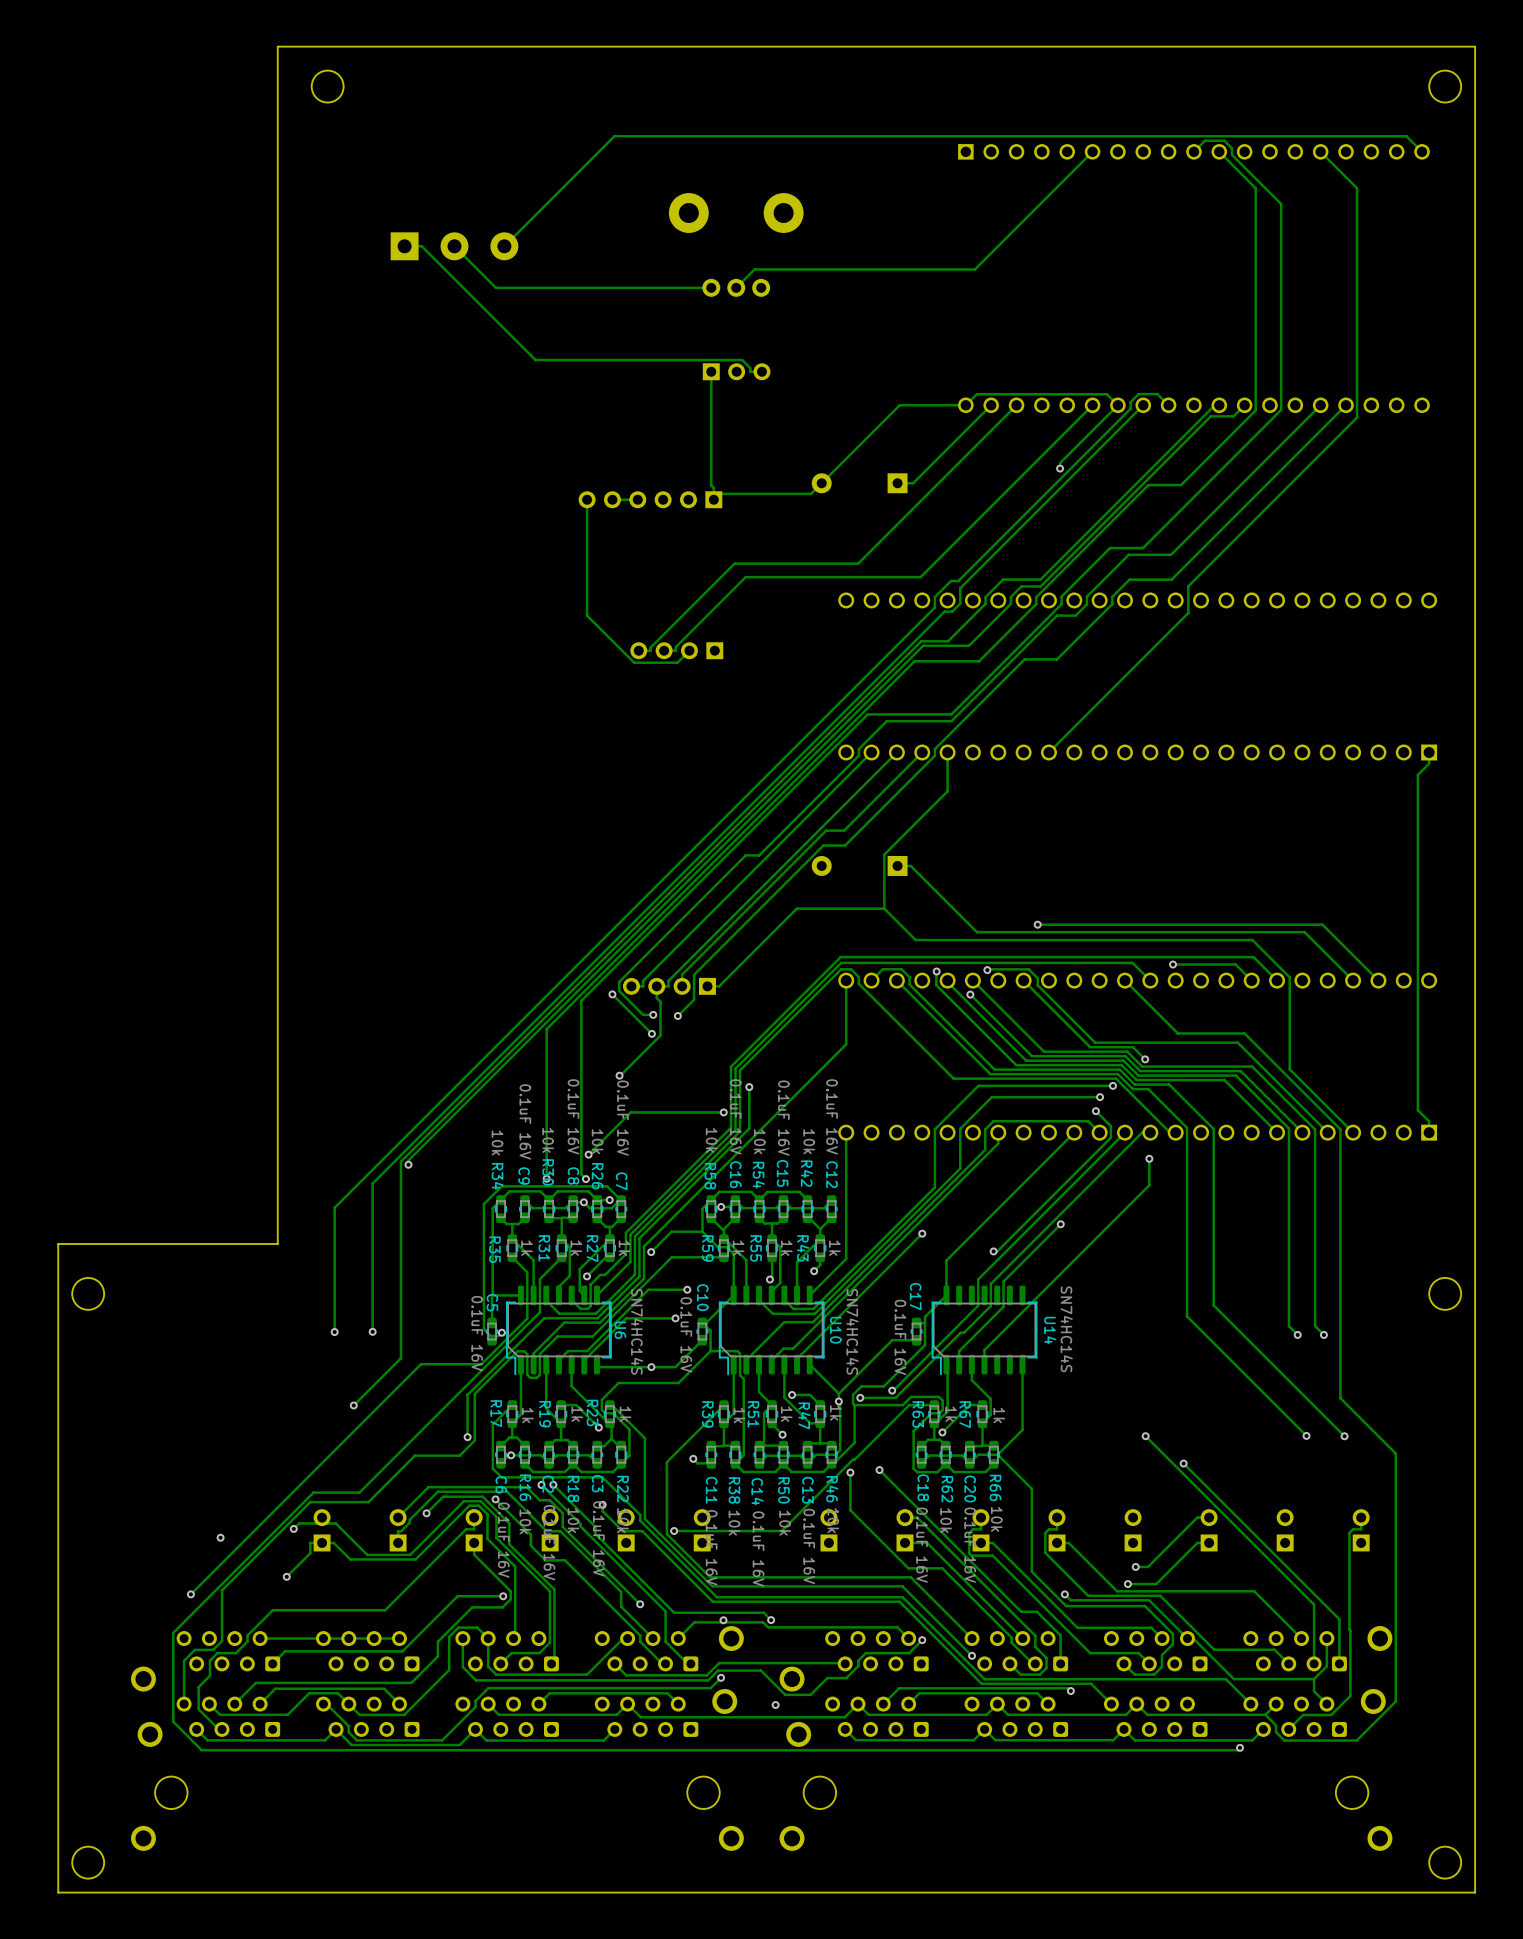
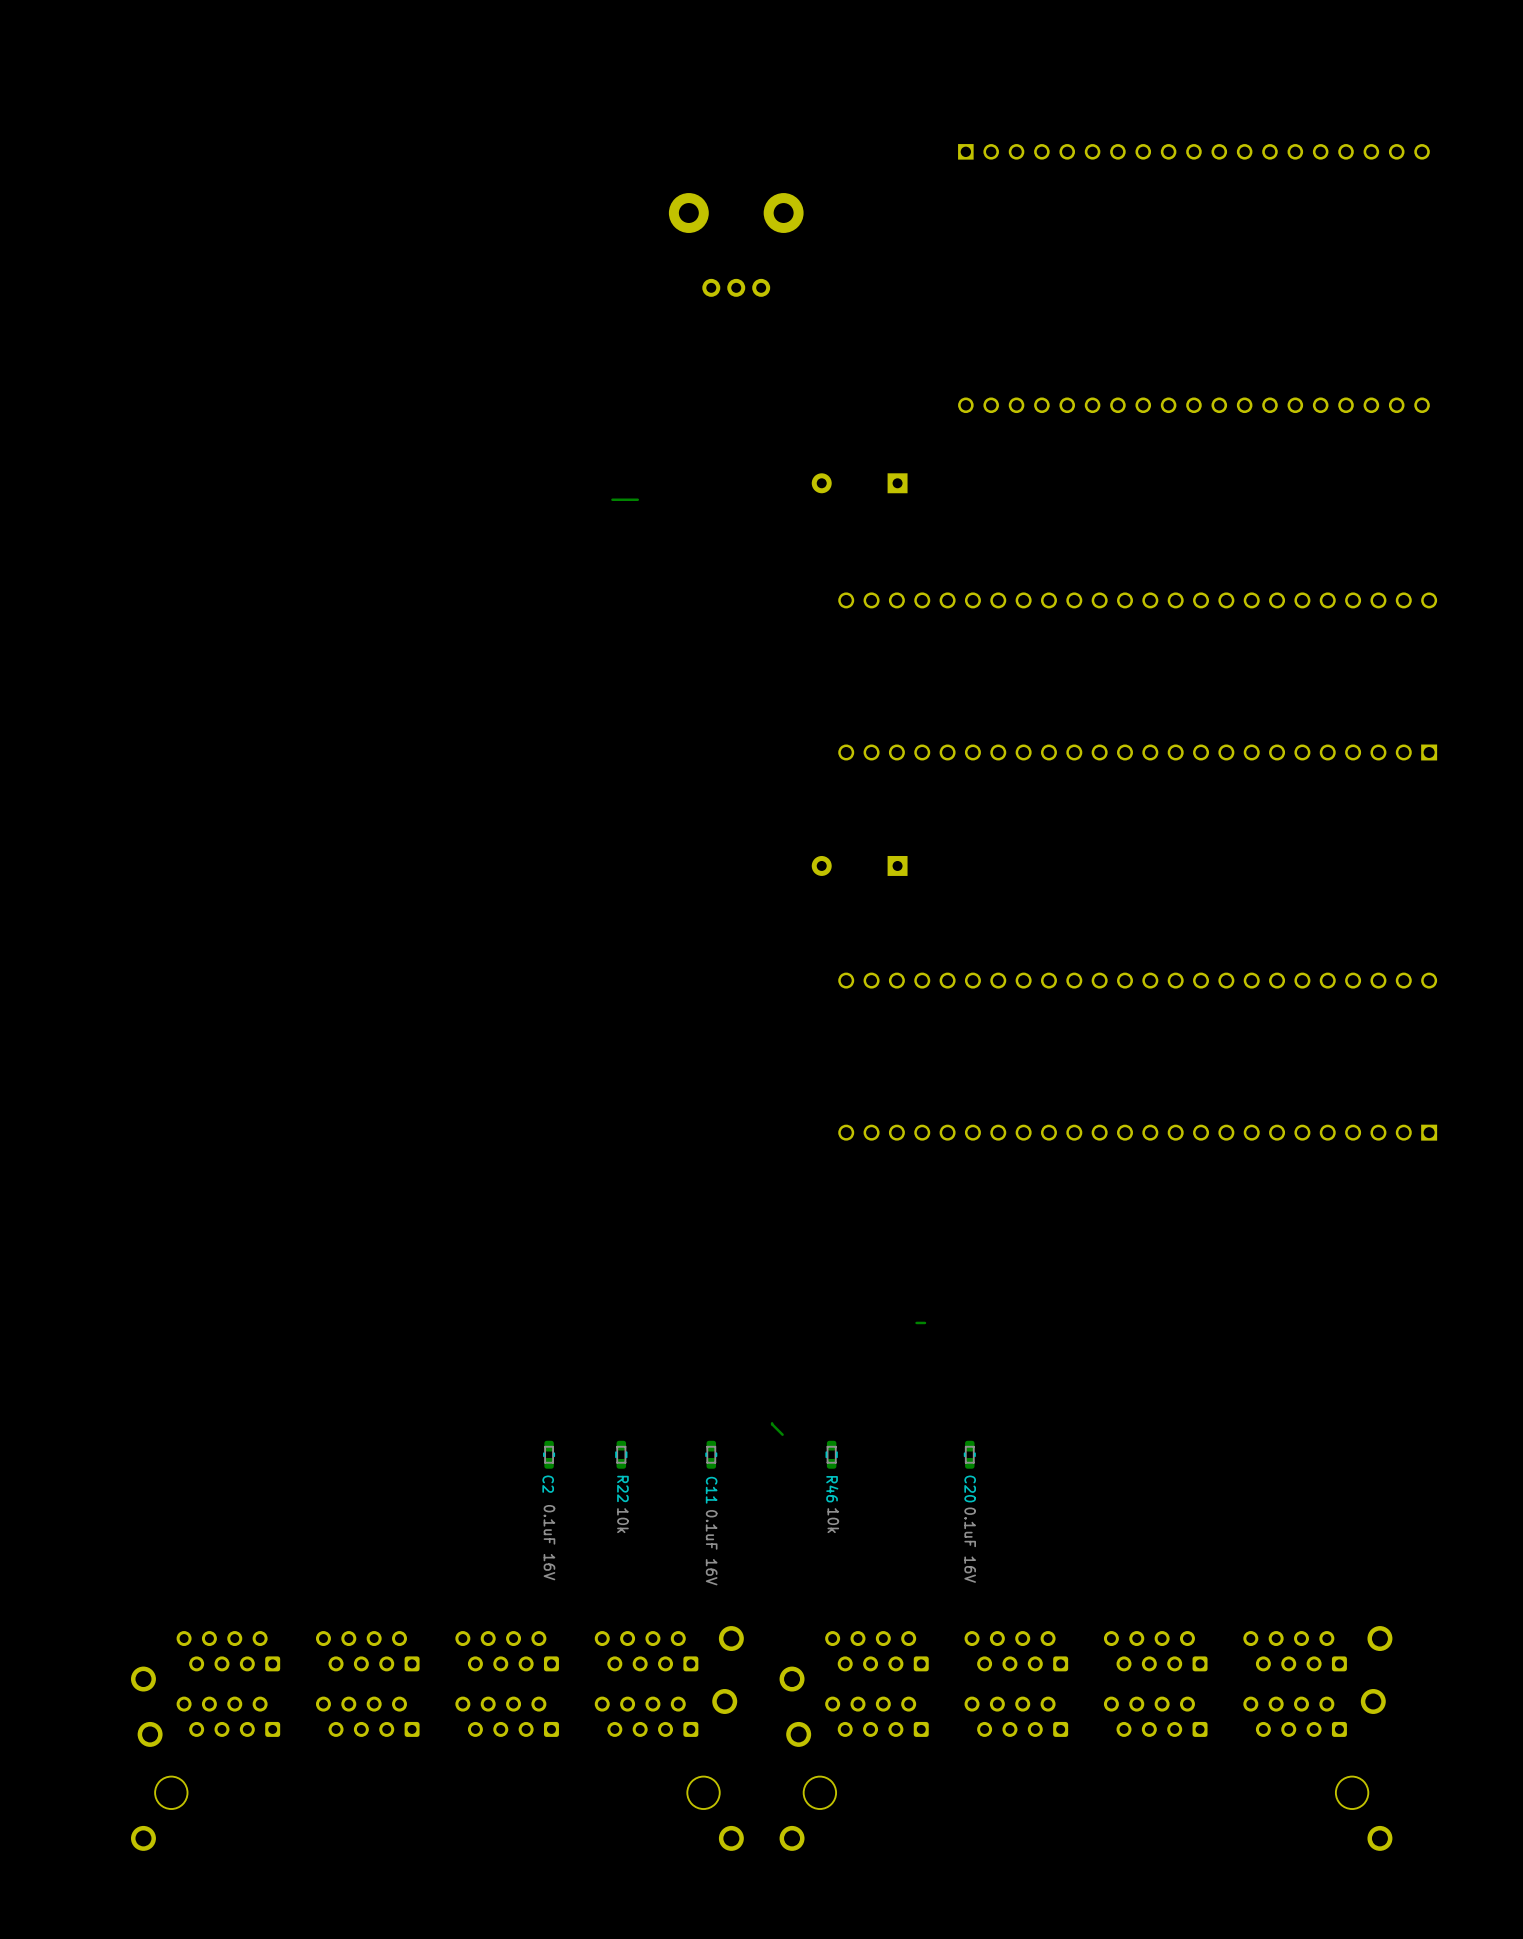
board edge: (1475, 46) (277, 46) (277, 1244) (58, 1244) (58, 1892) (1475, 1892) (1475, 46) -> none
round board edge: [311, 70, 344, 103] -> none
round board edge: [1428, 70, 1462, 103] -> none
track: (1092, 151) (974, 269) (754, 269) (736, 287) -> none
track: (1193, 151) (1205, 140) (1224, 140) (1231, 148) (1231, 154) (1281, 203) (1281, 409) (1142, 548) (1110, 548) (1061, 596) (1061, 604) (951, 714) (867, 714) (581, 1000) (581, 1174) (585, 1179) -> none
track: (1219, 151) (1255, 188) (1255, 410) (1181, 485) (1148, 485) (1036, 597) (1036, 604) (979, 661) (914, 661) (546, 1029) (546, 1178) -> none
track: (1320, 151) (1357, 188) (1357, 417) (1188, 586) (1188, 613) (1048, 752) -> none
track: (1422, 151) (1406, 136) (614, 136) (504, 246) -> none
track: (404, 246) (421, 246) (535, 360) (742, 360) (750, 368) (750, 371) (761, 371) -> none
track: (454, 246) (496, 287) (711, 287) -> none
part: (454, 246) -> none
track: (711, 371) (711, 485) (713, 488) (713, 499) -> none
part: (736, 371) -> none
track: (991, 405) (913, 483) (897, 483) -> none
track: (1016, 405) (858, 563) (734, 563) (650, 647) (650, 650) (638, 650) -> none
track: (1092, 405) (920, 577) (745, 577) (675, 647) (675, 650) (664, 650) -> none
track: (1143, 405) (960, 588) (960, 603) (952, 611) (944, 611) (372, 1183) (372, 1331) -> none
track: (1168, 405) (1157, 394) (1138, 394) (1130, 402) (1130, 408) (958, 581) (951, 581) (934, 597) (934, 607) (334, 1207) (334, 1332) -> none
track: (1219, 405) (1214, 405) (1040, 579) (1003, 579) (985, 597) (985, 603) (948, 641) (921, 641) (400, 1161) (400, 1358) (353, 1405) -> none
track: (1244, 405) (1233, 416) (1210, 416) (1040, 586) (1021, 586) (1010, 596) (1010, 603) (969, 645) (923, 645) (408, 1160) (408, 1164) -> none
track: (1320, 405) (1171, 554) (1128, 554) (1086, 596) (1086, 604) (1075, 615) (1057, 615) (951, 721) (886, 721) (858, 749) (858, 755) (759, 855) (745, 855) (619, 981) (619, 990) (643, 1014) (653, 1014) -> none
track: (1346, 405) (1171, 579) (1129, 579) (1112, 596) (1112, 604) (1057, 659) (1024, 659) (934, 749) (934, 755) (845, 845) (823, 845) (694, 974) (694, 999) (677, 1016) -> none
track: (1060, 468) (1060, 463) (1117, 405) (1106, 394) (976, 394) (965, 405) (899, 405) (811, 493) (713, 493) -> none
via: (1060, 468) -> none
track: (587, 499) (587, 615) (634, 662) (677, 662) (689, 650) -> none
part: (650, 499) -> none
part: (676, 650) -> none
track: (871, 752) (643, 980) (643, 986) (631, 986) -> none
track: (896, 752) (668, 980) (668, 986) (656, 986) (656, 998) (660, 1001) (660, 1035) (619, 1075) -> none
track: (922, 752) (844, 830) (826, 830) (682, 974) (682, 986) -> none
track: (947, 752) (947, 791) (884, 854) (884, 908) -> none
track: (1429, 752) (1429, 763) (1417, 774) (1417, 1110) (1429, 1121) (1429, 1132) -> none
track: (897, 865) (910, 865) (976, 932) (1304, 932) (1353, 980) -> none
track: (884, 908) (915, 940) (1252, 940) (1289, 977) (1289, 1069) (1353, 1132) -> none
track: (884, 908) (796, 908) (719, 986) (707, 986) -> none
track: (1037, 924) (1322, 924) (1378, 980) -> none
via: (1037, 924) -> none
track: (1173, 964) (1235, 964) (1251, 980) -> none
via: (1173, 964) -> none
track: (987, 970) (1028, 969) (1037, 978) (1037, 985) (1095, 1042) (1237, 1042) (1327, 1132) -> none
via: (987, 970) -> none
track: (936, 971) (936, 985) (1016, 1065) (1121, 1065) (1136, 1080) (1224, 1080) (1277, 1132) -> none
via: (936, 971) -> none
track: (846, 980) (846, 1044) (643, 1246) (643, 1278) (600, 1322) (564, 1322) (533, 1353) (533, 1364) -> none
track: (871, 980) (882, 969) (901, 969) (909, 977) (909, 984) (994, 1069) (1119, 1069) (1134, 1084) (1169, 1084) (1213, 1129) (1213, 1305) (1344, 1436) -> none
track: (896, 980) (990, 1074) (1117, 1074) (1132, 1089) (1148, 1089) (1187, 1127) (1187, 1316) (1306, 1435) -> none
track: (947, 980) (1026, 1060) (1123, 1060) (1138, 1075) (1236, 1075) (1288, 1128) (1288, 1326) (1297, 1334) -> none
track: (972, 980) (1044, 1051) (1127, 1051) (1142, 1066) (1252, 1066) (1315, 1129) (1315, 1326) (1323, 1334) -> none
track: (1023, 980) (1090, 1047) (1133, 1047) (1145, 1059) -> none
track: (1125, 980) (1177, 1033) (1244, 1033) (1340, 1129) (1340, 1398) (1395, 1453) (1395, 1701) (1356, 1740) (1284, 1740) (1276, 1732) (1276, 1725) (1265, 1714) -> none
track: (1150, 980) (1132, 962) (841, 962) (735, 1068) (735, 1129) (630, 1234) (630, 1261) (596, 1295) -> none
track: (1277, 980) (1253, 957) (840, 957) (731, 1066) (731, 1127) (625, 1232) (625, 1254) (605, 1274) (600, 1274) (590, 1284) (590, 1306) (588, 1308) (580, 1308) (571, 1299) (571, 1295) -> none
part: (669, 986) -> none
track: (612, 994) (651, 1033) -> none
via: (612, 994) -> none
track: (970, 994) (1031, 1056) (1125, 1056) (1140, 1071) (1240, 1071) (1302, 1132) -> none
via: (970, 994) -> none
via: (653, 1014) -> none
via: (677, 1016) -> none
via: (651, 1033) -> none
via: (1145, 1059) -> none
via: (619, 1075) -> none
track: (1112, 1085) (978, 1085) (934, 1129) (934, 1187) (813, 1308) (793, 1308) (784, 1299) (784, 1295) -> none
via: (1112, 1085) -> none
track: (749, 1087) (749, 1128) (639, 1238) (639, 1276) (597, 1318) (544, 1318) (467, 1394) (467, 1437) -> none
via: (749, 1087) -> none
track: (1100, 1097) (991, 1097) (960, 1128) (960, 1168) (814, 1313) (772, 1313) (759, 1300) (759, 1295) -> none
via: (1100, 1097) -> none
track: (1095, 1111) (1110, 1126) (1110, 1137) (997, 1251) (993, 1251) -> none
via: (1095, 1111) -> none
track: (723, 1112) (630, 1112) (588, 1154) -> none
via: (723, 1112) -> none
track: (846, 1132) (846, 1258) (809, 1295) -> none
track: (998, 1132) (998, 1143) (793, 1348) (783, 1348) (771, 1360) (771, 1364) -> none
track: (1074, 1132) (946, 1260) (946, 1295) (924, 1316) (924, 1345) (883, 1386) (861, 1386) (853, 1394) (854, 1405) -> none
track: (1099, 1132) (1088, 1121) (993, 1121) (985, 1129) (985, 1149) (812, 1322) (784, 1322) (746, 1360) (746, 1364) -> none
track: (1125, 1132) (978, 1279) (978, 1305) (892, 1390) -> none
track: (1150, 1132) (1142, 1132) (990, 1283) (990, 1305) (964, 1332) (960, 1332) (895, 1397) (860, 1397) -> none
track: (1175, 1132) (1170, 1132) (1116, 1078) (953, 1078) (858, 983) (858, 977) (851, 969) (841, 969) (739, 1070) (739, 1131) (634, 1236) (634, 1274) (595, 1313) (559, 1313) (546, 1300) (546, 1295) -> none
via: (588, 1154) -> none
track: (1149, 1158) (1149, 1185) (984, 1350) (984, 1364) -> none
via: (1149, 1158) -> none
via: (408, 1164) -> none
via: (546, 1178) -> none
via: (585, 1179) -> none
track: (620, 1199) (611, 1208) (589, 1208) (583, 1202) (573, 1200) (565, 1208) (532, 1208) (525, 1200) -> none
track: (609, 1200) (597, 1200) (588, 1191) (557, 1191) (549, 1200) (540, 1191) (509, 1191) (492, 1208) (492, 1295) -> none
via: (609, 1200) -> none
track: (621, 1200) (607, 1186) (501, 1186) (483, 1204) (483, 1329) (490, 1336) (498, 1336) (501, 1332) -> none
track: (807, 1200) (799, 1191) (767, 1191) (759, 1200) (751, 1191) (719, 1191) (702, 1208) (702, 1231) -> none
track: (831, 1200) (823, 1208) (791, 1208) (783, 1200) (775, 1208) (742, 1208) (735, 1200) (728, 1206) (721, 1206) -> none
via: (583, 1202) -> none
via: (721, 1206) -> none
R34: 10k (500, 1209) -> none
C9: 0.1uF 16V (525, 1209) -> none
R30: 10k (549, 1209) -> none
C8: 0.1uF 16V (573, 1209) -> none
R26: 10k (597, 1209) -> none
C7: 0.1uF 16V (621, 1209) -> none
R58: 10k (711, 1209) -> none
C16: 0.1uF 16V (735, 1209) -> none
R54: 10k (759, 1209) -> none
C15: 0.1uF 16V (783, 1209) -> none
R42: 10k (807, 1209) -> none
C12: 0.1uF 16V (831, 1209) -> none
track: (525, 1217) (518, 1224) (506, 1224) (500, 1218) -> none
track: (573, 1217) (561, 1218) -> none
track: (621, 1217) (612, 1226) (605, 1226) (597, 1218) -> none
track: (735, 1217) (723, 1229) -> none
track: (783, 1217) (777, 1223) (764, 1223) (759, 1218) -> none
track: (831, 1217) (820, 1229) -> none
track: (561, 1218) (561, 1239) (569, 1247) (569, 1275) (558, 1286) (558, 1295) -> none
track: (561, 1218) (549, 1218) -> none
track: (711, 1218) (723, 1229) -> none
track: (807, 1218) (820, 1229) -> none
track: (772, 1223) (772, 1239) (780, 1247) (780, 1282) (771, 1291) (771, 1295) -> none
track: (512, 1224) (512, 1239) (533, 1260) (533, 1295) -> none
track: (1060, 1224) (1003, 1281) (1003, 1306) (959, 1351) (959, 1364) -> none
via: (1060, 1224) -> none
track: (609, 1226) (609, 1239) (579, 1269) (579, 1290) (584, 1295) -> none
track: (723, 1229) (723, 1239) (746, 1260) (746, 1295) -> none
track: (820, 1229) (820, 1239) (797, 1262) (797, 1295) -> none
track: (702, 1231) (717, 1247) (726, 1247) (733, 1253) (733, 1295) (704, 1324) -> none
track: (702, 1231) (671, 1231) (651, 1252) -> none
track: (922, 1233) (797, 1358) (797, 1364) -> none
via: (922, 1233) -> none
R35: 1k (512, 1248) -> none
R31: 1k (561, 1248) -> none
R27: 1k (609, 1248) -> none
R59: 1k (723, 1248) -> none
R55: 1k (772, 1248) -> none
R43: 1k (820, 1248) -> none
via: (993, 1251) -> none
via: (651, 1252) -> none
track: (512, 1257) (527, 1272) (527, 1318) (481, 1364) (421, 1364) (190, 1594) -> none
track: (561, 1257) (539, 1279) (539, 1312) (359, 1492) (313, 1492) (173, 1632) (173, 1721) (201, 1750) (1237, 1750) (1240, 1747) -> none
track: (609, 1257) (606, 1257) (586, 1276) -> none
track: (723, 1257) (671, 1257) (592, 1336) (557, 1336) (539, 1354) (539, 1374) (536, 1377) (530, 1377) (527, 1374) (527, 1354) (524, 1351) (517, 1351) (474, 1393) (474, 1440) (459, 1455) (414, 1455) (368, 1502) (310, 1502) (222, 1590) (222, 1641) (213, 1649) (195, 1649) (184, 1660) (184, 1704) -> none
track: (772, 1257) (772, 1277) (769, 1279) -> none
track: (820, 1257) (820, 1265) (814, 1271) -> none
via: (814, 1271) -> none
via: (586, 1276) -> none
round board edge: [71, 1277, 105, 1311] -> none
round board edge: [1428, 1277, 1462, 1311] -> none
via: (769, 1279) -> none
track: (687, 1289) (648, 1289) (587, 1351) (568, 1351) (558, 1360) (558, 1364) -> none
via: (687, 1289) -> none
track: (492, 1295) (492, 1322) -> none
track: (520, 1295) (492, 1295) -> none
track: (675, 1318) (626, 1318) (584, 1360) (584, 1364) -> none
via: (675, 1318) -> none
track: (702, 1322) (710, 1331) (710, 1351) -> none
U6: SN74HC14S (558, 1330) -> none
U10: SN74HC14S (771, 1330) -> none
U14: SN74HC14S (984, 1330) -> none
via: (372, 1331) -> none
C5: 0.1uF 16V (492, 1331) -> none
C10: 0.1uF 16V (702, 1331) -> none
C17: 0.1uF 16V (916, 1331) -> none
via: (334, 1332) -> none
via: (501, 1332) -> none
via: (1297, 1334) -> none
via: (1323, 1334) -> none
track: (702, 1340) (675, 1367) (599, 1367) (596, 1364) -> none
track: (916, 1340) (892, 1340) (838, 1393) -> none
track: (710, 1351) (678, 1382) (618, 1382) (601, 1399) (601, 1409) (605, 1413) (613, 1413) (629, 1429) (629, 1455) (613, 1471) (581, 1471) (573, 1463) (565, 1471) (533, 1471) (525, 1463) -> none
track: (710, 1351) (737, 1351) (740, 1353) (740, 1375) (743, 1378) (743, 1455) (735, 1463) (743, 1471) (775, 1471) (783, 1463) (791, 1471) (823, 1471) (854, 1442) (854, 1405) -> none
track: (520, 1364) (520, 1414) (512, 1423) (512, 1437) -> none
track: (546, 1364) (546, 1408) (561, 1423) (561, 1440) -> none
track: (571, 1364) (571, 1386) (611, 1424) (611, 1438) -> none
track: (733, 1364) (733, 1413) (723, 1423) (723, 1445) -> none
track: (759, 1364) (759, 1392) (772, 1405) (764, 1413) (764, 1445) -> none
track: (784, 1364) (784, 1397) (810, 1423) (820, 1423) (820, 1443) -> none
track: (809, 1364) (838, 1393) -> none
track: (946, 1364) (947, 1411) (934, 1423) (934, 1439) -> none
track: (971, 1364) (971, 1380) (990, 1398) (990, 1415) (982, 1423) (982, 1445) -> none
track: (1022, 1364) (1022, 1430) (997, 1454) -> none
via: (651, 1367) -> none
via: (892, 1390) -> none
track: (838, 1393) (840, 1450) (835, 1454) (816, 1454) (807, 1463) (799, 1455) (767, 1455) (759, 1463) -> none
track: (792, 1394) (810, 1394) (820, 1405) -> none
via: (792, 1394) -> none
via: (860, 1397) -> none
via: (838, 1401) -> none
via: (353, 1405) -> none
track: (512, 1405) (492, 1424) (492, 1468) (501, 1477) (602, 1477) (640, 1515) (640, 1520) (716, 1597) (902, 1597) (984, 1679) (1226, 1679) (1250, 1704) -> none
track: (561, 1405) (576, 1405) (598, 1427) -> none
track: (609, 1405) (644, 1438) (644, 1518) (712, 1586) (902, 1586) (972, 1655) -> none
track: (723, 1405) (666, 1462) (666, 1534) (710, 1577) (910, 1577) (972, 1638) -> none
track: (854, 1405) (902, 1405) (911, 1396) (938, 1396) (942, 1400) (942, 1410) (939, 1413) (931, 1413) (913, 1431) (913, 1468) (917, 1472) (937, 1472) (945, 1463) (953, 1472) (985, 1472) (993, 1463) -> none
track: (934, 1405) (909, 1405) (781, 1530) (674, 1530) -> none
track: (982, 1405) (969, 1405) (942, 1432) -> none
R17: 1k (512, 1414) -> none
R19: 1k (561, 1414) -> none
R23: 1k (609, 1414) -> none
R39: 1k (723, 1414) -> none
R51: 1k (772, 1414) -> none
R47: 1k (820, 1414) -> none
R63: 1k (934, 1414) -> none
R67: 1k (982, 1414) -> none
via: (598, 1427) -> none
via: (942, 1432) -> none
via: (782, 1434) -> none
via: (1306, 1435) -> none
track: (1145, 1436) (1314, 1604) (1314, 1663) -> none
via: (1145, 1436) -> none
via: (1344, 1436) -> none
via: (467, 1437) -> none
track: (611, 1438) (604, 1446) (597, 1446) -> none
track: (611, 1438) (618, 1445) (621, 1445) -> none
track: (525, 1445) (516, 1437) (509, 1437) (500, 1446) -> none
track: (573, 1445) (567, 1440) (555, 1440) (549, 1446) -> none
track: (723, 1445) (711, 1446) -> none
track: (735, 1445) (723, 1445) -> none
track: (783, 1445) (764, 1445) -> none
track: (831, 1445) (829, 1443) (810, 1443) (807, 1446) -> none
track: (945, 1445) (939, 1439) (927, 1439) (921, 1446) -> none
track: (982, 1445) (969, 1446) -> none
track: (993, 1445) (982, 1445) -> none
C6: 0.1uF 16V (500, 1454) -> none
R16: 10k (525, 1454) -> none
R18: 10k (573, 1454) -> none
C3: 0.1uF 16V (597, 1454) -> none
R38: 10k (735, 1454) -> none
C14: 0.1uF 16V (759, 1454) -> none
R50: 10k (783, 1454) -> none
C13: 0.1uF 16V (807, 1454) -> none
C18: 0.1uF 16V (921, 1454) -> none
R62: 10k (945, 1454) -> none
R66: 10k (993, 1454) -> none
track: (997, 1454) (1031, 1488) (1031, 1571) (1066, 1606) (1145, 1606) (1172, 1633) (1172, 1644) (1162, 1655) (1162, 1666) (1154, 1674) (1134, 1674) (1124, 1663) -> none
track: (997, 1454) (978, 1454) (969, 1463) (962, 1455) (929, 1455) (921, 1463) -> none
via: (511, 1455) -> none
track: (693, 1458) (697, 1463) (711, 1463) -> none
via: (693, 1458) -> none
track: (597, 1463) (589, 1455) (557, 1455) (549, 1463) (541, 1455) (508, 1455) (500, 1463) -> none
track: (1183, 1463) (1339, 1619) (1339, 1663) -> none
via: (1183, 1463) -> none
track: (879, 1470) (1021, 1611) (1036, 1611) (1060, 1635) (1060, 1663) -> none
via: (879, 1470) -> none
track: (850, 1472) (850, 1510) (908, 1568) (942, 1568) (1011, 1637) (1011, 1642) (1032, 1663) (1035, 1663) -> none
via: (850, 1472) -> none
track: (541, 1484) (665, 1611) (665, 1641) (687, 1663) (690, 1663) -> none
via: (541, 1484) -> none
track: (553, 1484) (595, 1526) (595, 1534) (674, 1612) (763, 1612) (771, 1620) -> none
via: (553, 1484) -> none
track: (495, 1499) (530, 1534) (530, 1545) (545, 1560) (564, 1560) (640, 1635) (640, 1641) (662, 1663) (665, 1663) -> none
via: (495, 1499) -> none
track: (602, 1504) (602, 1511) (622, 1531) (642, 1531) (712, 1601) (899, 1601) (981, 1683) (1091, 1683) (1111, 1704) -> none
via: (602, 1504) -> none
track: (426, 1513) (443, 1496) (482, 1496) (509, 1523) (509, 1544) (554, 1589) (554, 1660) (551, 1663) -> none
via: (426, 1513) -> none
track: (398, 1517) (428, 1487) (526, 1487) (539, 1500) (549, 1500) (562, 1513) (562, 1526) (640, 1604) -> none
track: (474, 1517) (474, 1529) (466, 1529) (385, 1610) (272, 1610) (247, 1635) (247, 1641) (235, 1653) (217, 1653) (209, 1660) (209, 1675) (198, 1687) (198, 1709) (218, 1729) (221, 1729) -> none
track: (904, 1517) (917, 1517) (1035, 1635) (1035, 1646) (1046, 1658) (1046, 1668) (1039, 1674) (1020, 1674) (1009, 1663) -> none
track: (981, 1517) (981, 1529) (972, 1529) (969, 1532) (969, 1553) (971, 1555) (992, 1555) (1090, 1653) (1138, 1653) (1149, 1663) -> none
track: (1057, 1517) (1057, 1529) (1048, 1529) (1045, 1532) (1045, 1552) (1088, 1595) (1160, 1595) (1214, 1649) (1274, 1649) (1288, 1663) -> none
track: (1209, 1517) (1197, 1517) (1148, 1566) (1135, 1566) -> none
track: (1361, 1517) (1361, 1529) (1353, 1529) (1349, 1532) (1350, 1695) (1331, 1714) (1303, 1714) (1288, 1729) -> none
track: (293, 1528) (299, 1523) (335, 1523) (367, 1554) (410, 1554) (463, 1501) (480, 1501) (496, 1516) (496, 1537) (549, 1591) (549, 1642) (539, 1653) (511, 1653) (500, 1663) -> none
via: (293, 1528) -> none
part: (322, 1530) -> none
part: (398, 1530) -> none
part: (474, 1530) -> none
part: (550, 1530) -> none
part: (626, 1530) -> none
via: (674, 1530) -> none
part: (702, 1530) -> none
part: (828, 1530) -> none
part: (904, 1530) -> none
part: (981, 1530) -> none
part: (1057, 1530) -> none
part: (1133, 1530) -> none
part: (1209, 1530) -> none
part: (1285, 1530) -> none
part: (1361, 1530) -> none
via: (220, 1537) -> none
track: (398, 1542) (398, 1531) (401, 1531) (437, 1491) (507, 1491) (546, 1531) (560, 1531) (621, 1591) (621, 1606) (652, 1638) -> none
track: (474, 1542) (474, 1554) (510, 1591) (510, 1599) (502, 1607) (472, 1607) (437, 1641) (437, 1656) (411, 1682) (255, 1682) (234, 1704) -> none
track: (904, 1542) (927, 1542) (1022, 1638) -> none
track: (981, 1542) (992, 1542) (1077, 1627) (1151, 1627) (1162, 1638) -> none
track: (1057, 1542) (1068, 1542) (1117, 1591) (1254, 1591) (1301, 1638) -> none
track: (1209, 1542) (1197, 1542) (1156, 1584) (1127, 1584) -> none
via: (1135, 1566) -> none
track: (286, 1576) (310, 1553) (310, 1542) (333, 1542) (350, 1559) (415, 1559) (469, 1505) (478, 1505) (487, 1514) (487, 1538) (515, 1566) (515, 1636) (513, 1638) -> none
via: (286, 1576) -> none
via: (1127, 1584) -> none
via: (190, 1594) -> none
track: (1064, 1594) (1070, 1600) (1149, 1600) (1187, 1638) (1193, 1638) (1233, 1679) (1314, 1679) -> none
via: (1064, 1594) -> none
track: (503, 1596) (457, 1596) (402, 1651) (285, 1651) (272, 1663) -> none
via: (503, 1596) -> none
via: (640, 1604) -> none
via: (723, 1620) -> none
via: (771, 1620) -> none
track: (399, 1638) (260, 1638) -> none
track: (462, 1638) (462, 1667) (476, 1680) (708, 1680) (718, 1670) (761, 1670) (785, 1694) (810, 1694) (827, 1678) (846, 1678) (858, 1665) (858, 1660) (865, 1653) (909, 1653) (922, 1640) -> none
track: (627, 1638) (623, 1638) (587, 1674) (496, 1674) (488, 1666) (488, 1638) (477, 1627) (458, 1627) (449, 1636) (449, 1670) (404, 1714) (359, 1714) (337, 1693) (309, 1693) (287, 1714) (220, 1714) (209, 1704) -> none
track: (908, 1638) (897, 1627) (768, 1627) (763, 1622) (694, 1622) (678, 1638) -> none
track: (1326, 1638) (1326, 1666) (1314, 1679) -> none
via: (922, 1640) -> none
via: (972, 1655) -> none
track: (845, 1663) (719, 1663) (706, 1675) (626, 1675) (614, 1663) -> none
track: (721, 1677) (710, 1688) (488, 1688) (475, 1701) (475, 1707) (442, 1740) (356, 1740) (348, 1732) (348, 1726) (326, 1704) (323, 1704) -> none
via: (721, 1677) -> none
track: (1314, 1679) (1314, 1691) (1326, 1704) -> none
track: (1070, 1691) (1068, 1688) (899, 1688) (883, 1704) -> none
via: (1070, 1691) -> none
track: (399, 1704) (384, 1688) (275, 1688) (260, 1704) -> none
track: (488, 1704) (498, 1714) (616, 1714) (627, 1704) (640, 1717) (844, 1717) (857, 1704) (868, 1714) (986, 1714) (997, 1704) (1008, 1714) (1126, 1714) (1136, 1704) (1147, 1714) (1265, 1714) -> none
track: (678, 1704) (667, 1693) (549, 1693) (538, 1704) -> none
track: (1048, 1704) (1037, 1693) (919, 1693) (908, 1704) -> none
track: (1276, 1704) (1265, 1714) -> none
via: (775, 1705) -> none
track: (614, 1729) (603, 1740) (486, 1740) (475, 1729) (459, 1745) (351, 1745) (336, 1729) (325, 1740) (207, 1740) (196, 1729) -> none
track: (1263, 1729) (1252, 1740) (1134, 1740) (1124, 1729) (1113, 1740) (995, 1740) (984, 1729) (973, 1740) (855, 1740) (845, 1729) -> none
via: (1240, 1747) -> none
round board edge: [71, 1846, 105, 1879] -> none
round board edge: [1428, 1846, 1462, 1879] -> none

